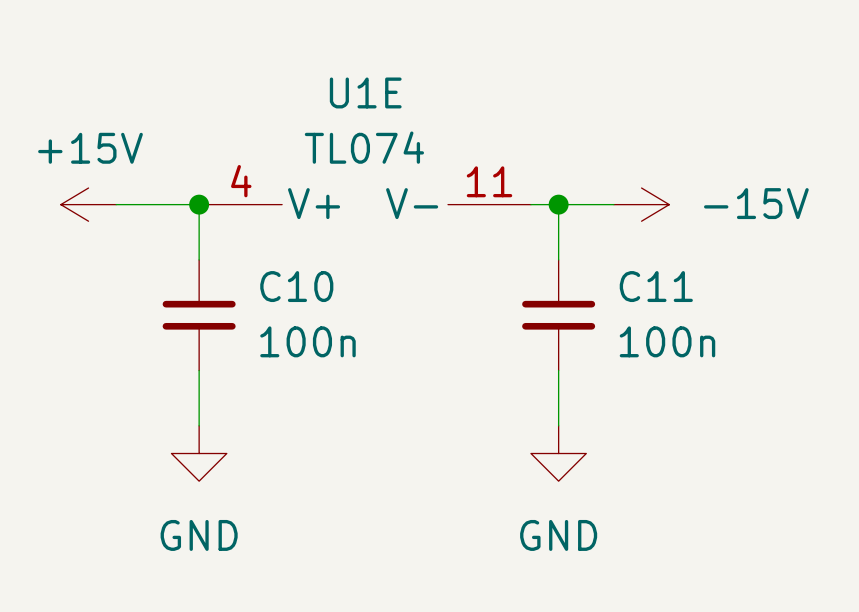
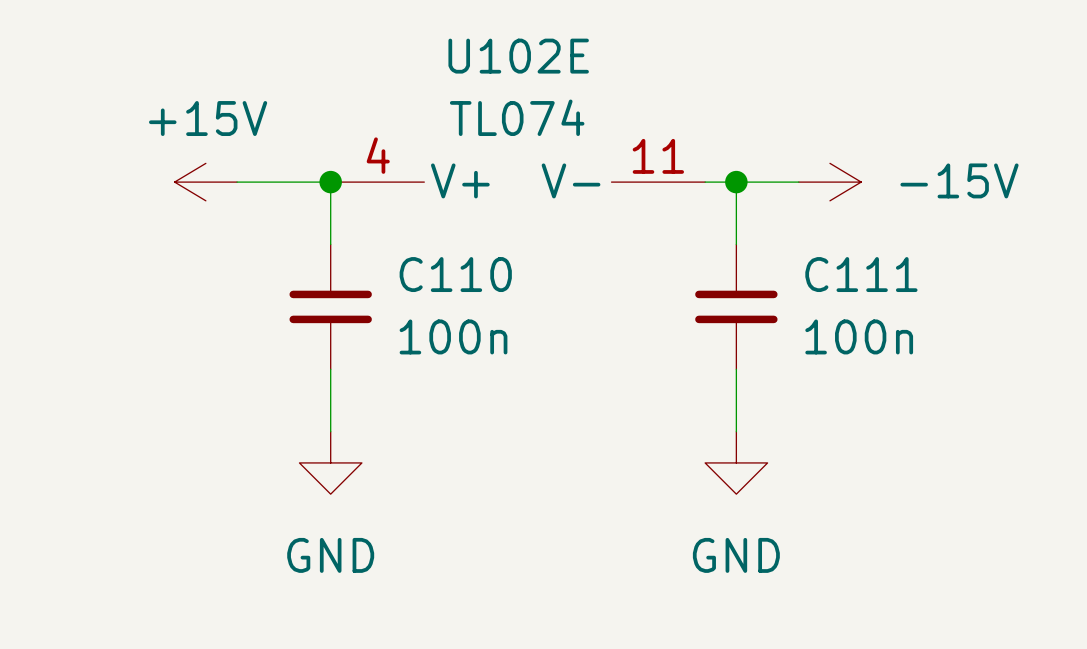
U1E name: U1E (365, 92) -> U102E (518, 56)
C10 name: C10 (296, 286) -> C110 (455, 274)
C11 name: C11 (656, 286) -> C111 (861, 274)

